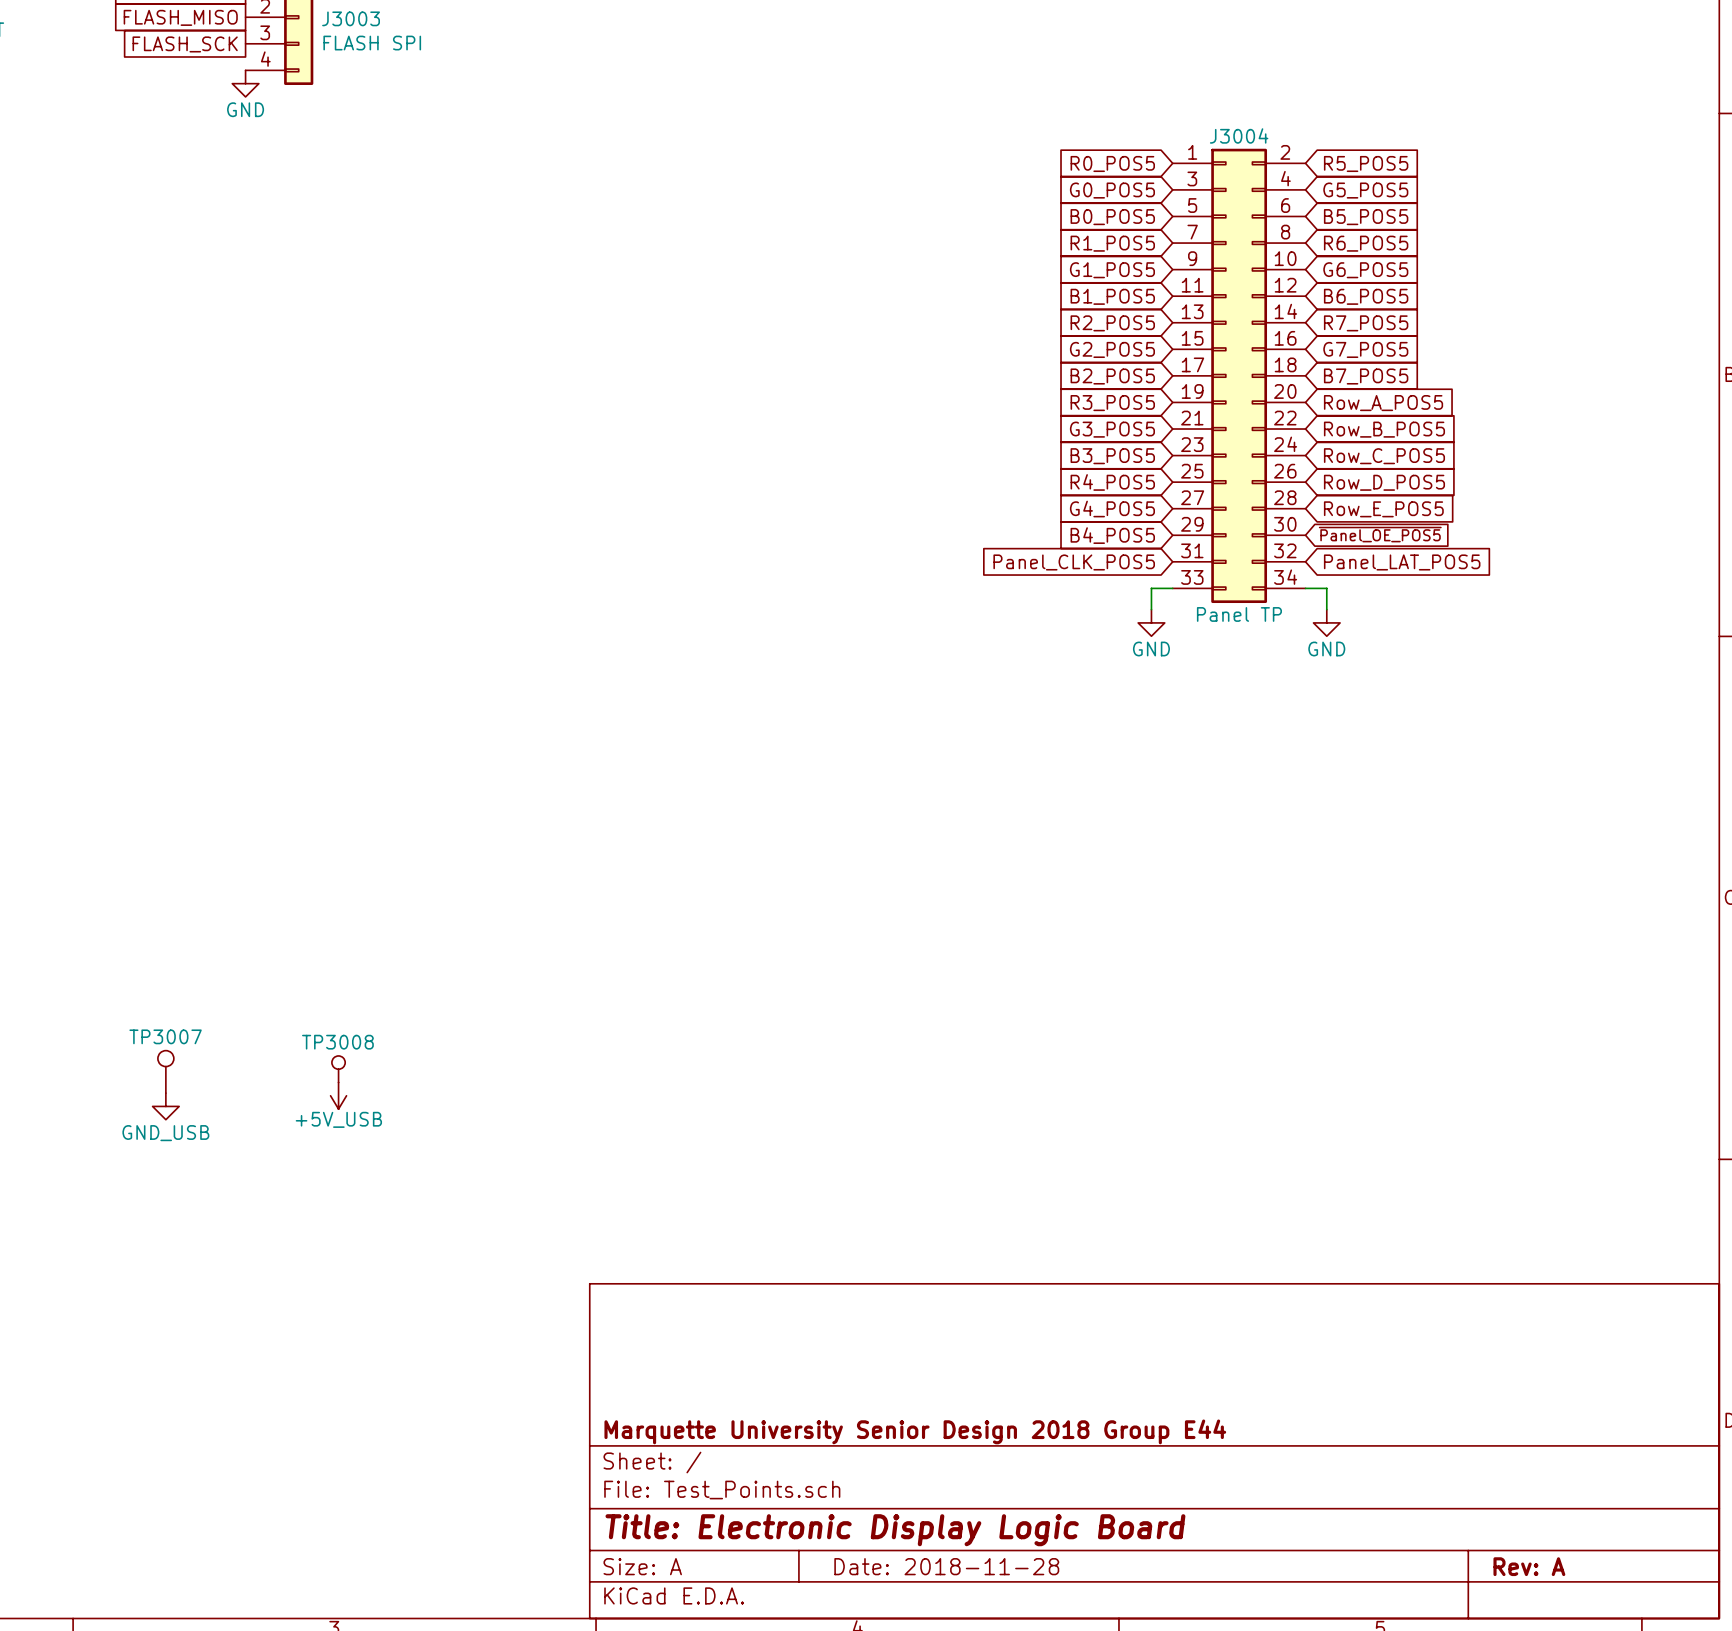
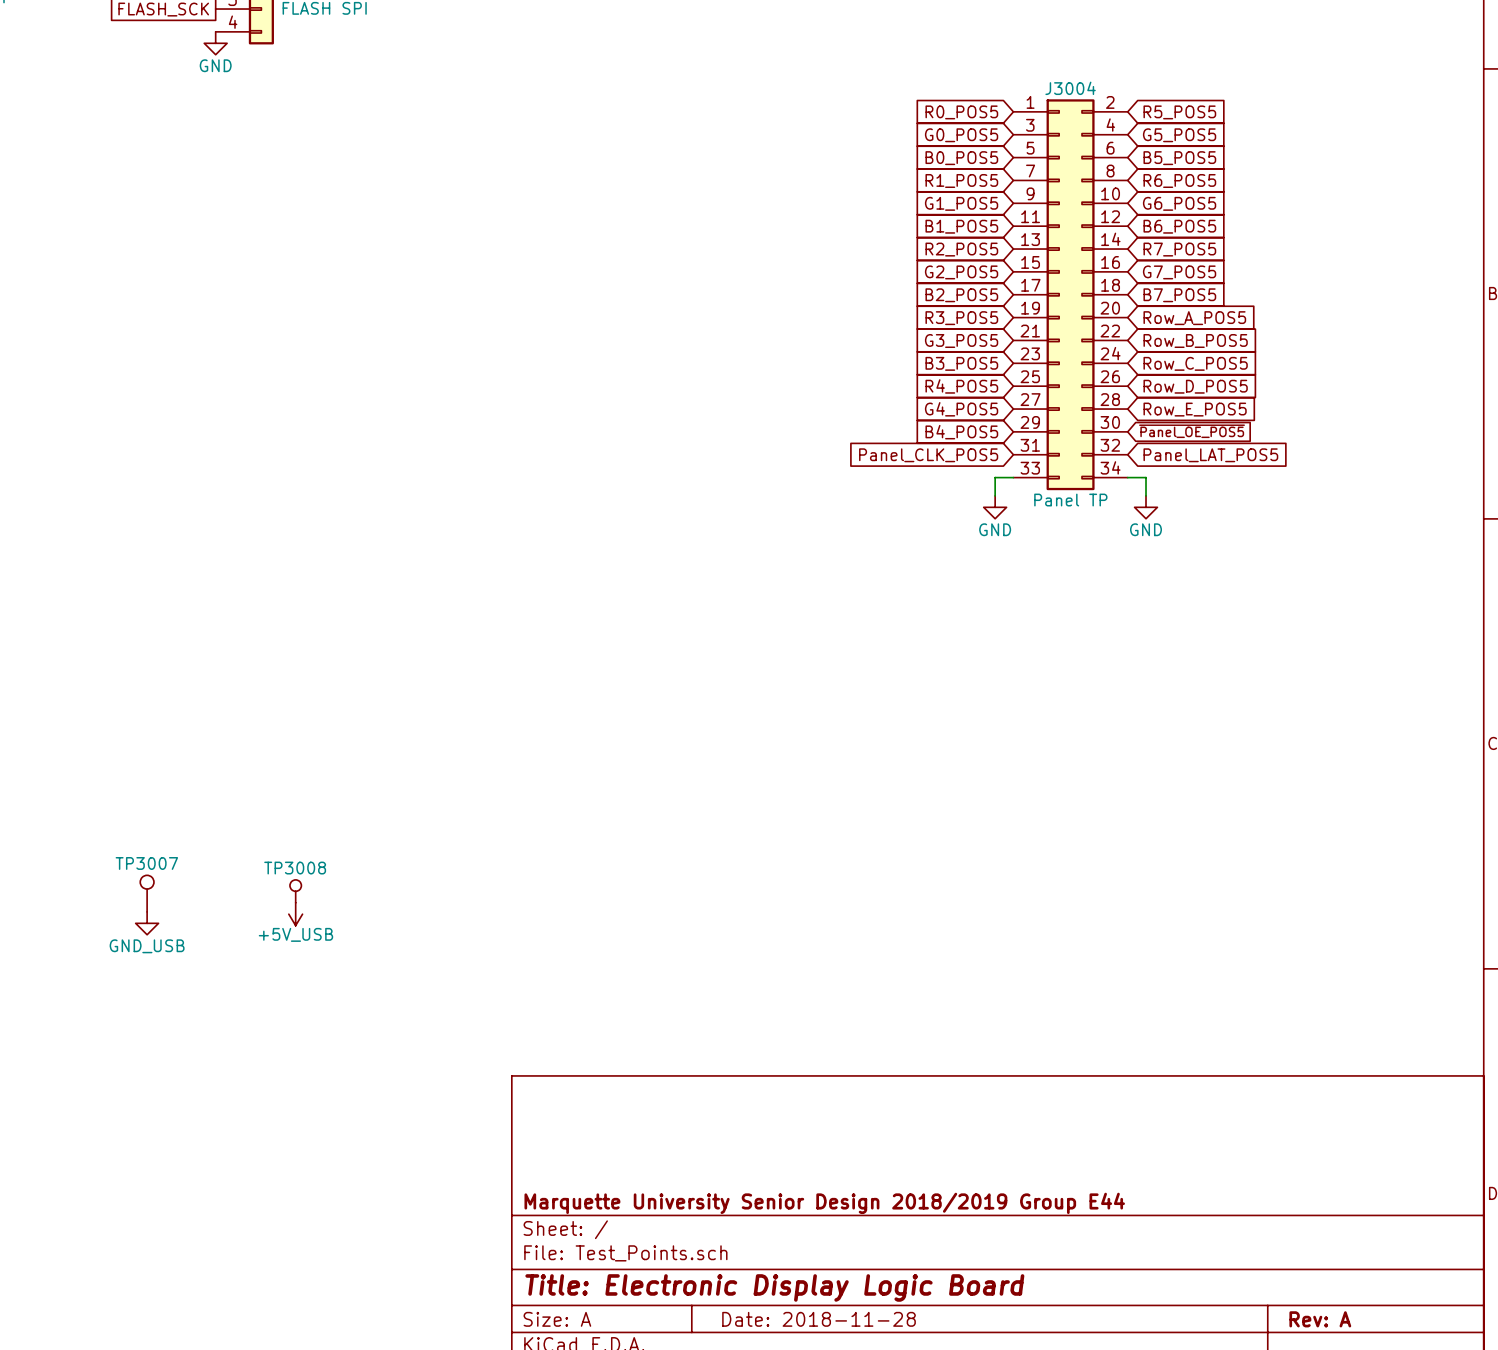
title block: Marquette University Senior Design 2018 Group E44 (915, 1431) -> Marquette University Senior Design 2018/2019 Group E44 (824, 1203)

